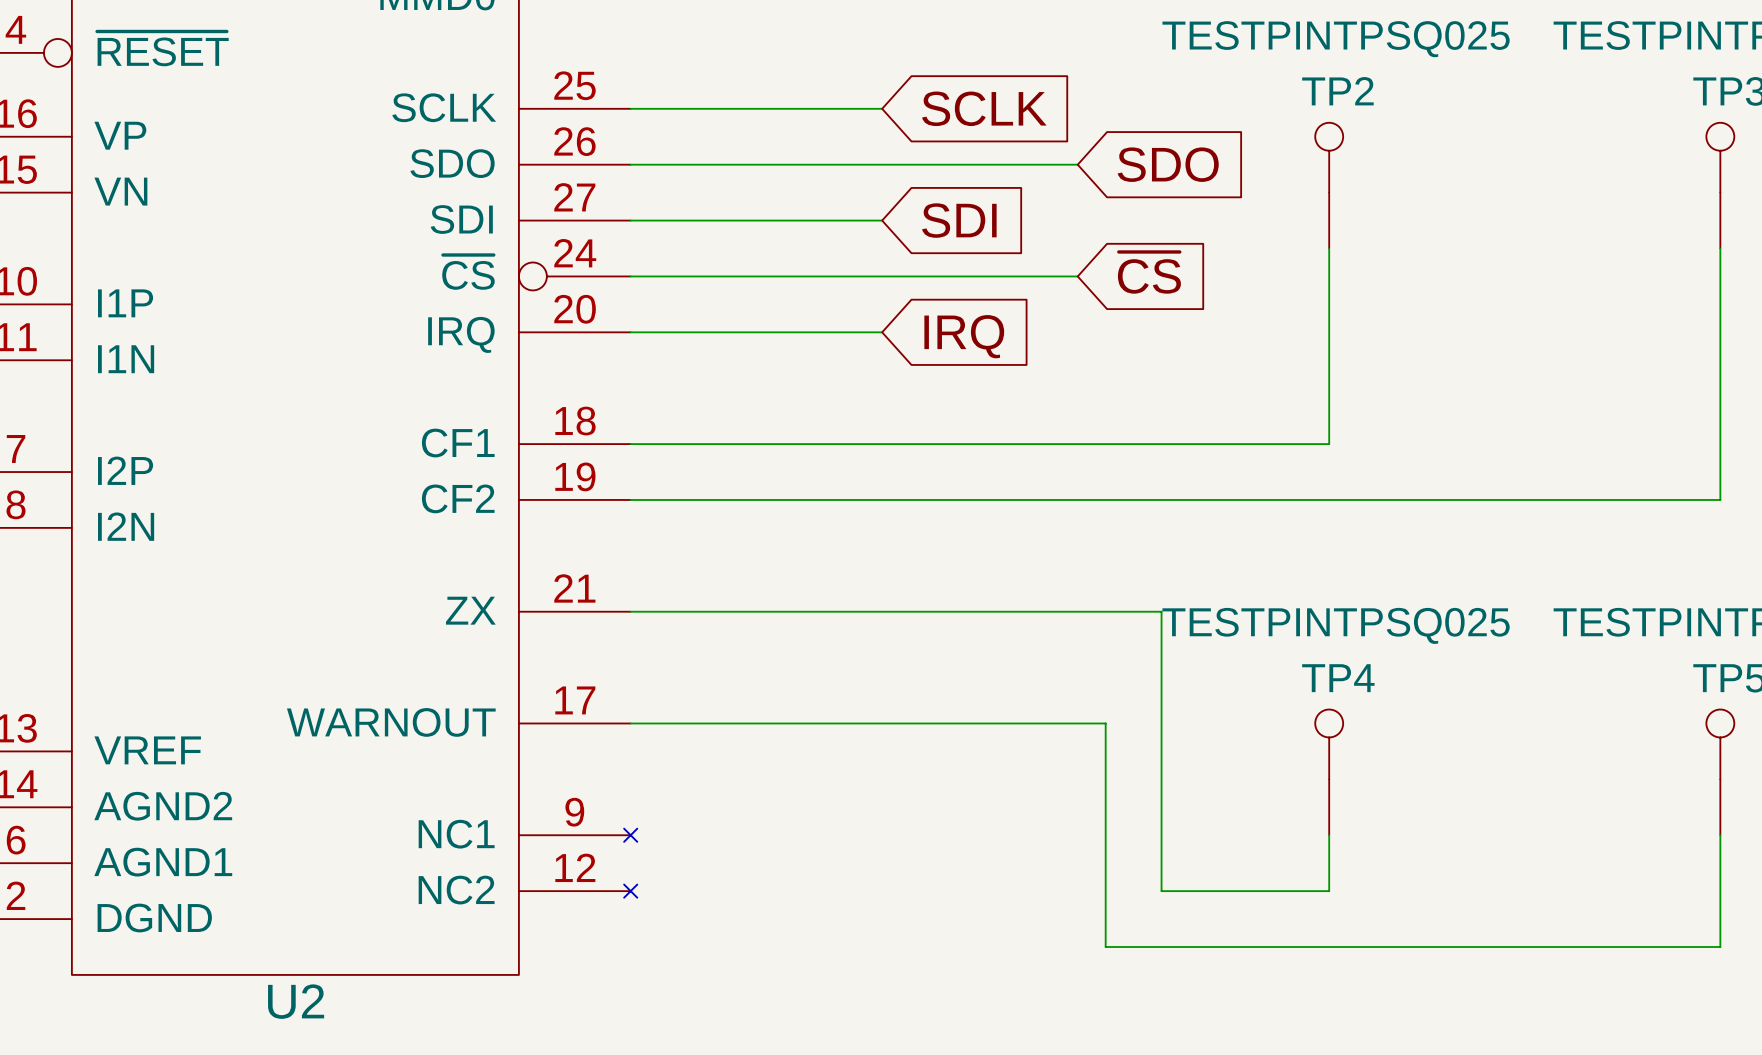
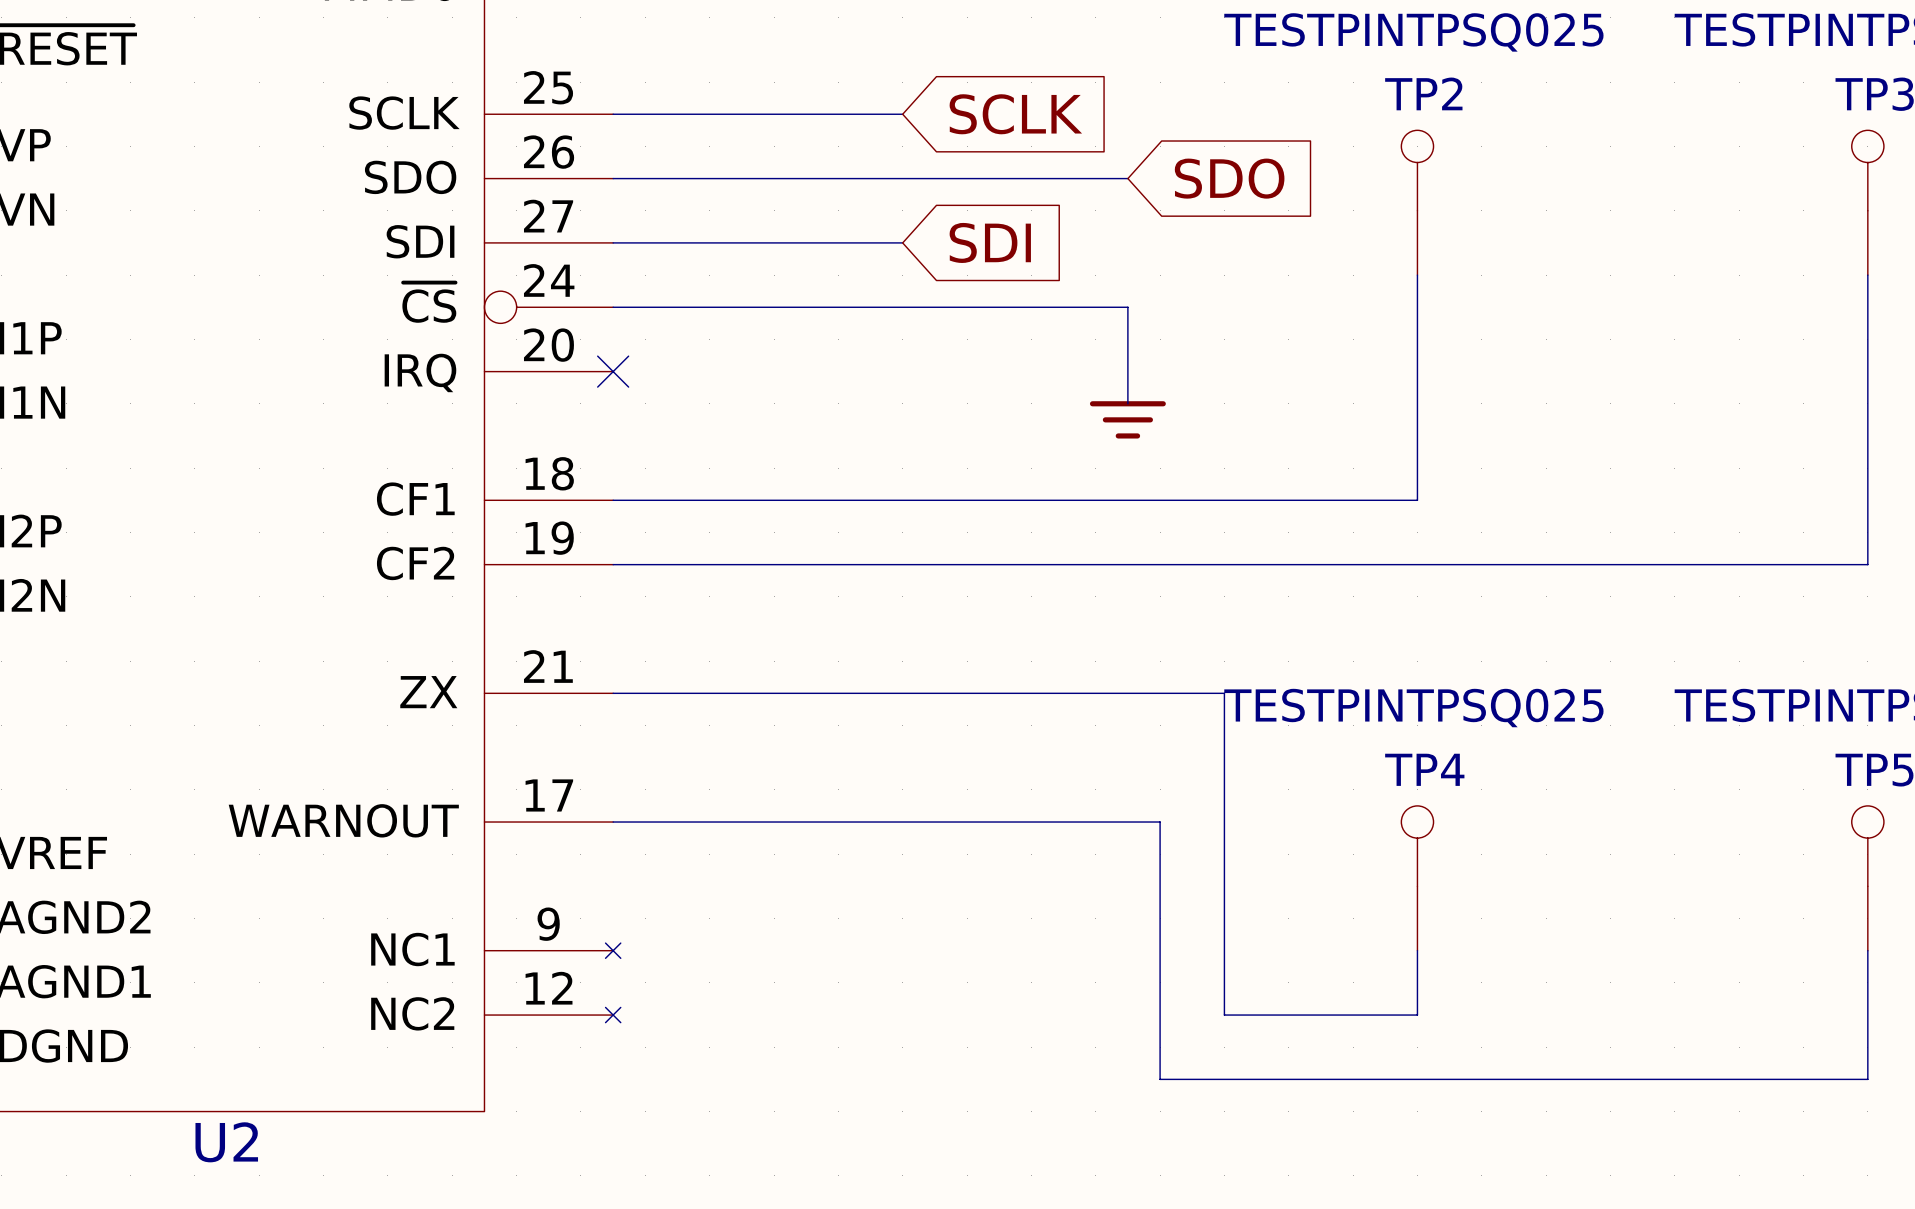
global label: ~{CS} (1149, 272) -> none
wire: none -> (1127, 307) (1127, 403)
wire: (630, 332) (882, 332) -> none
no-connect mark: none -> (613, 371)
global label: IRQ (964, 336) -> none
power symbol: none -> (1127, 419)

